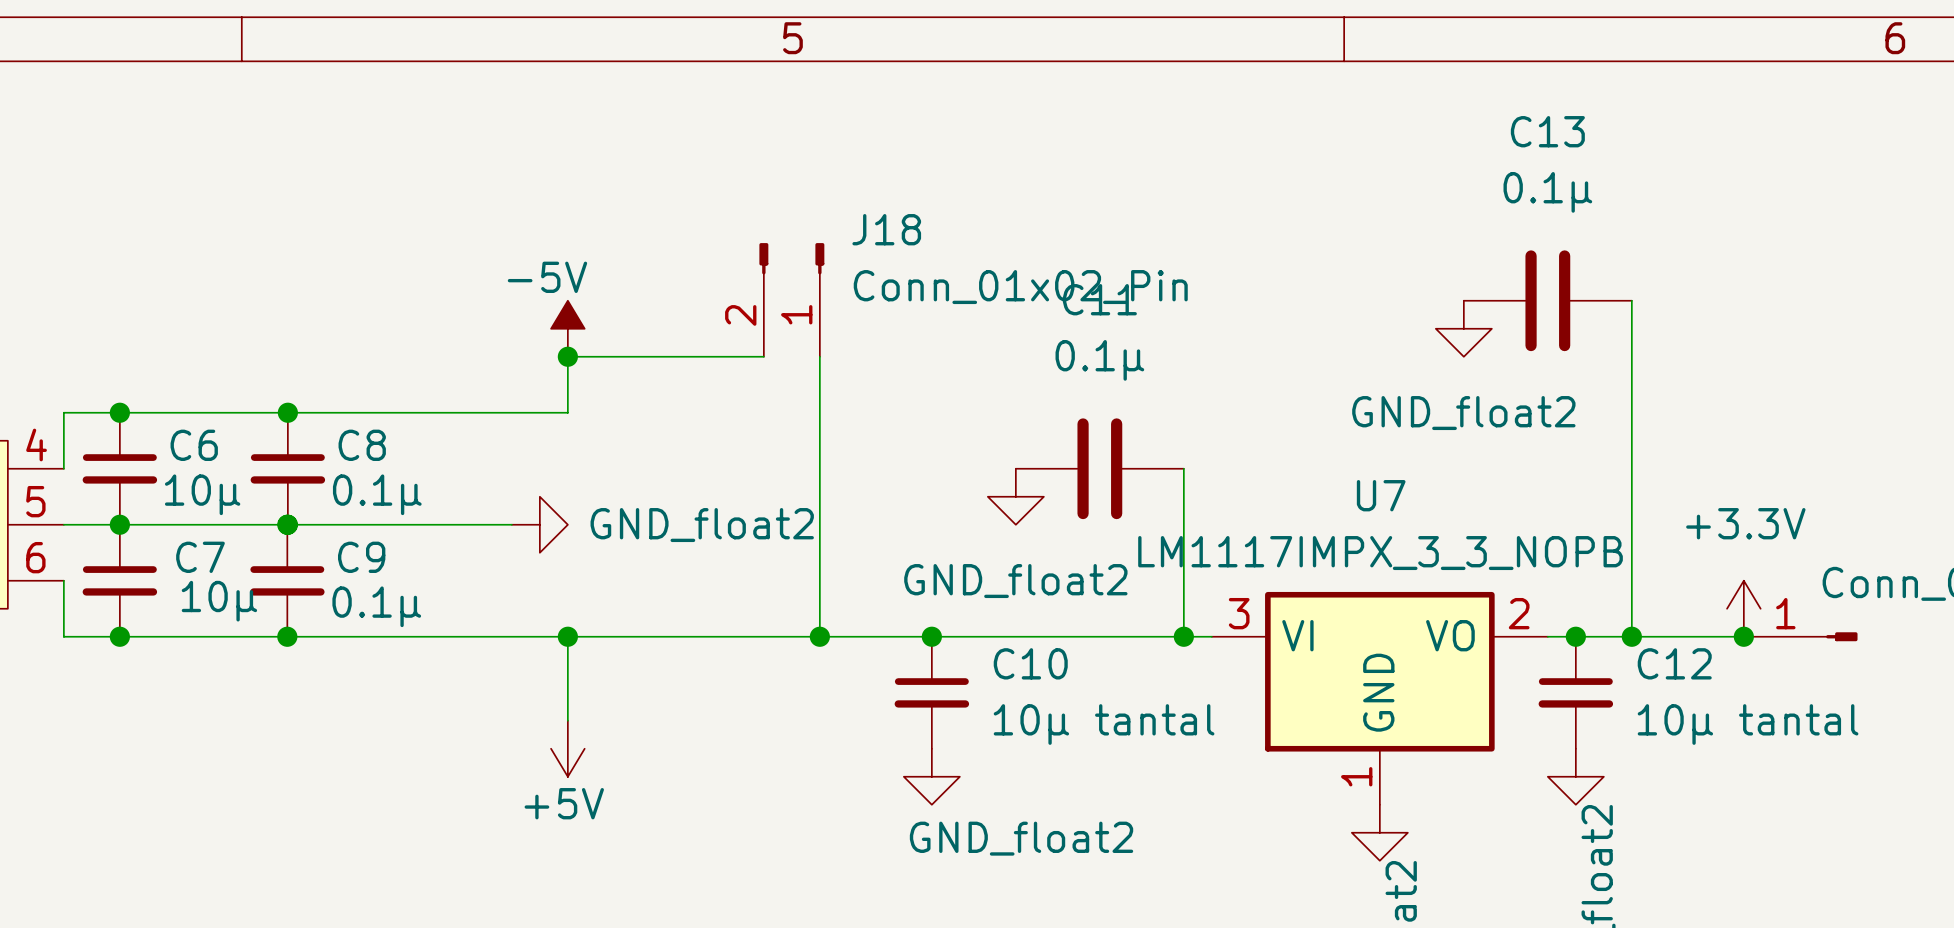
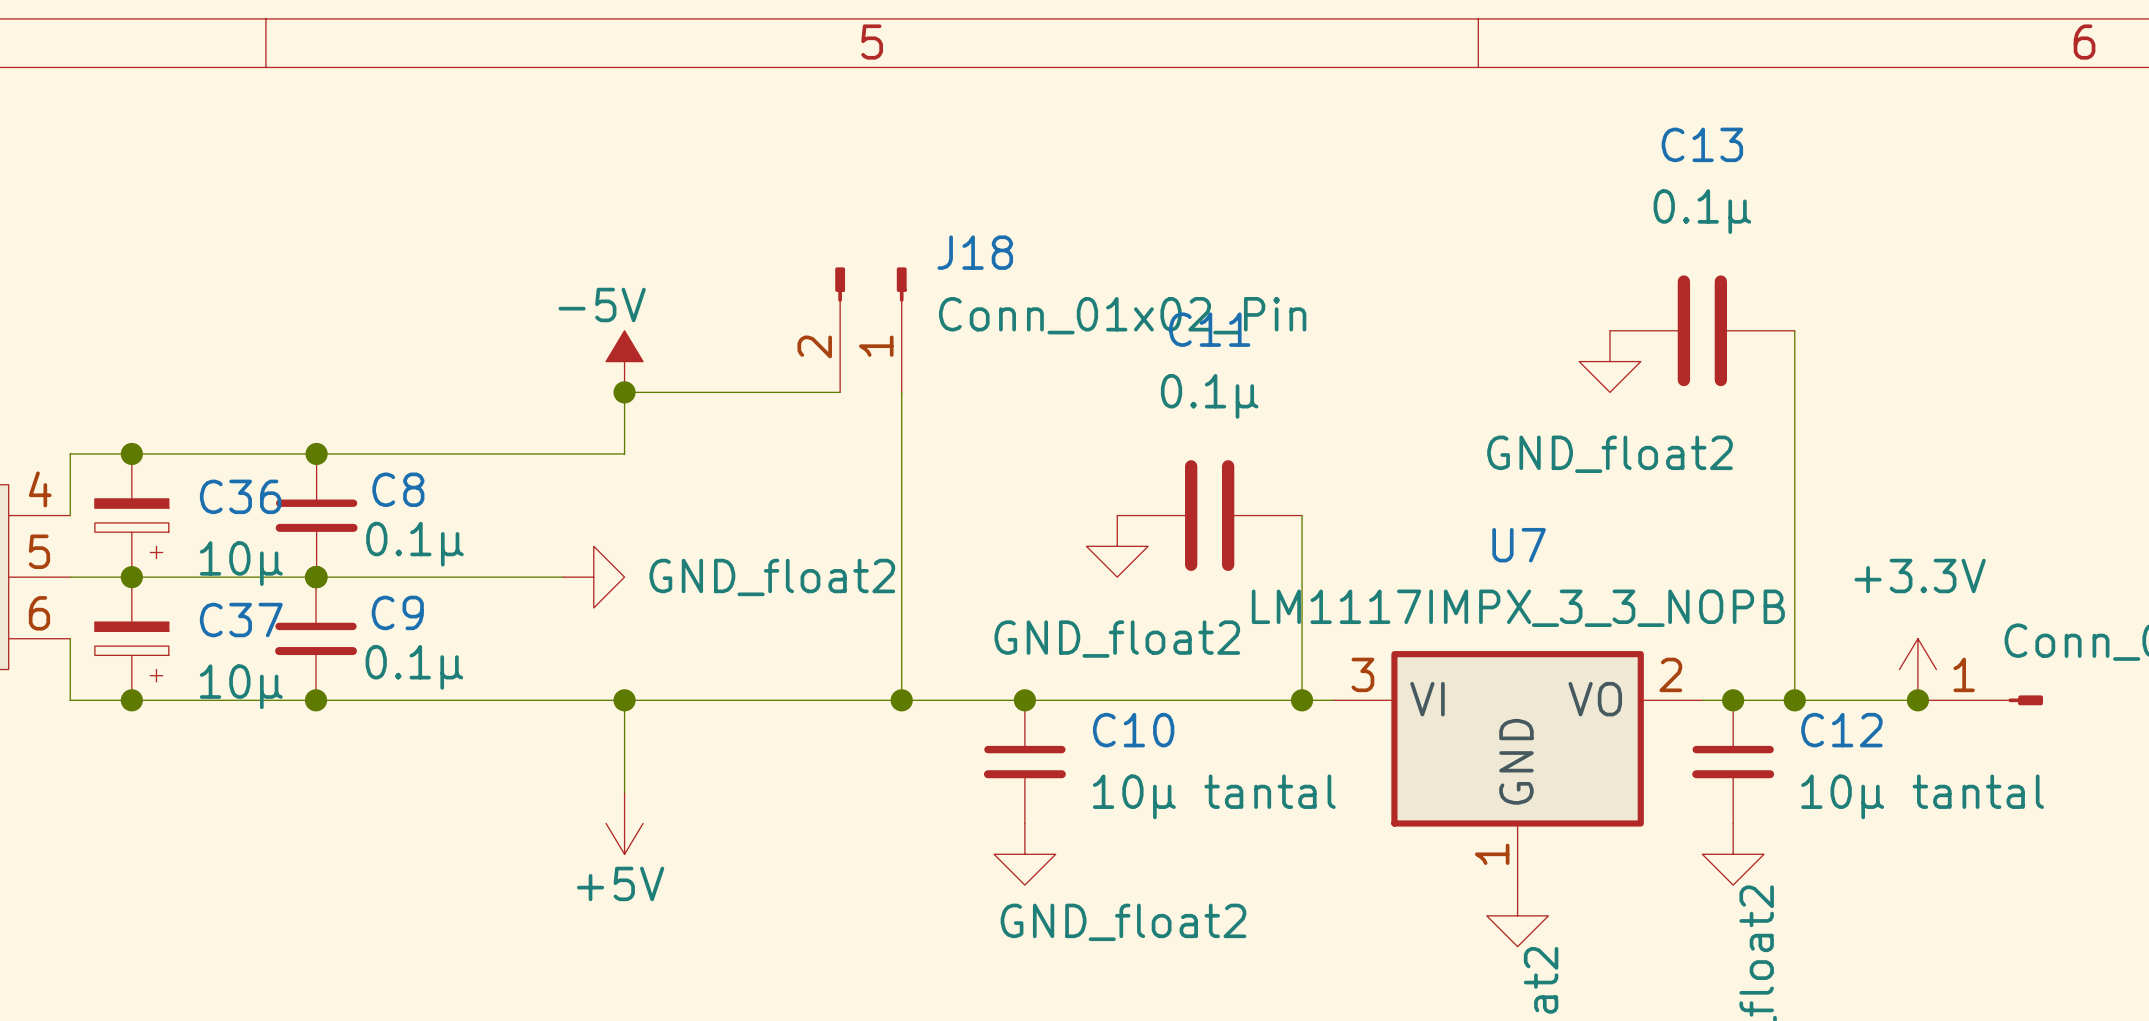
C6: 10µ (119, 468) -> none
C36: none -> 10µ (131, 515)
C7: 10µ (119, 580) -> none
C37: none -> 10µ (131, 638)

